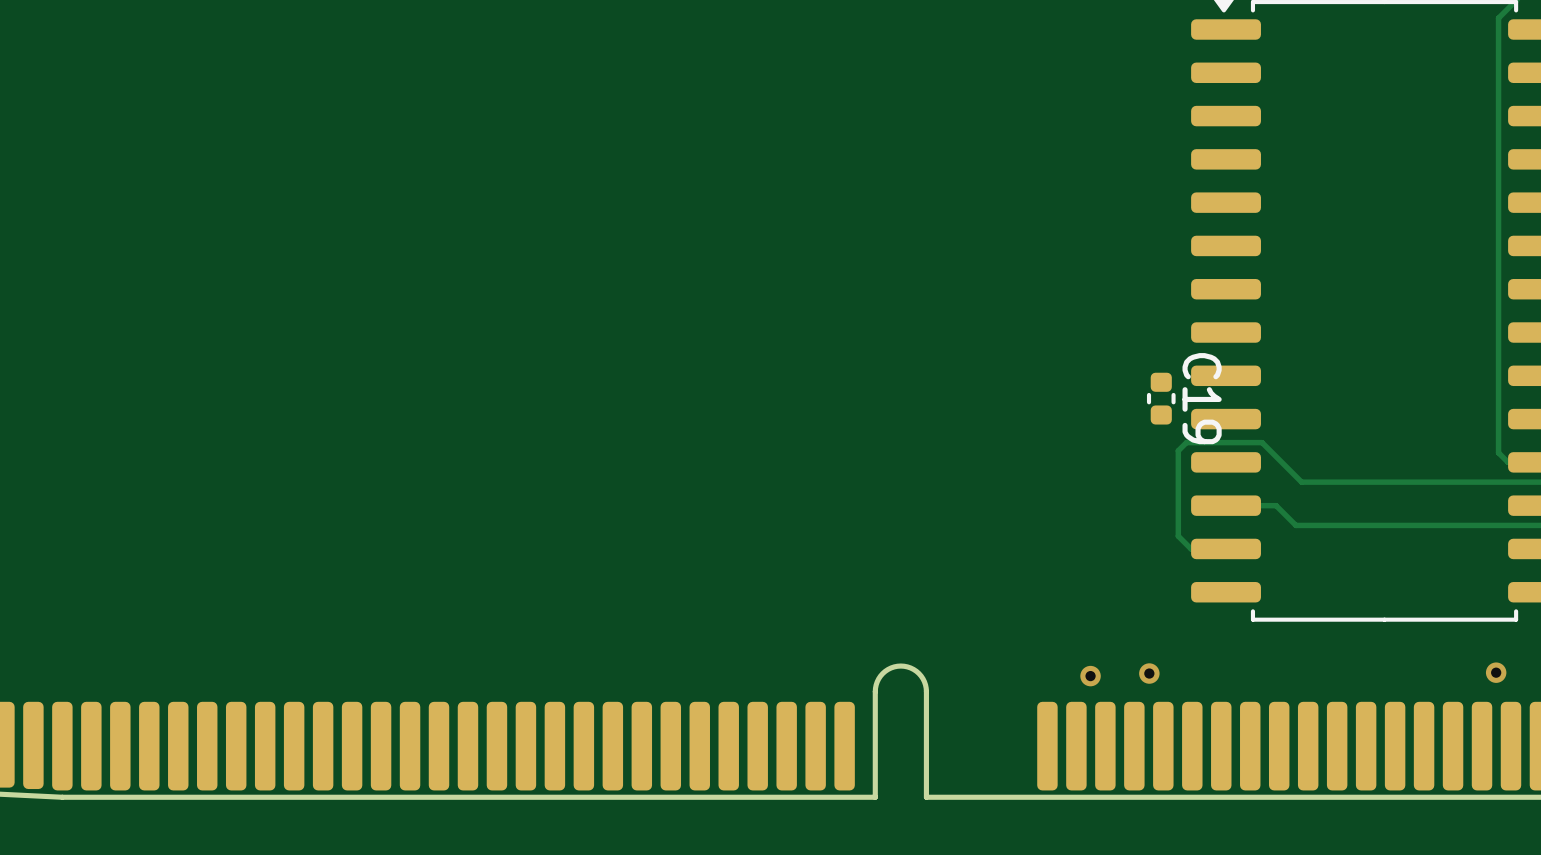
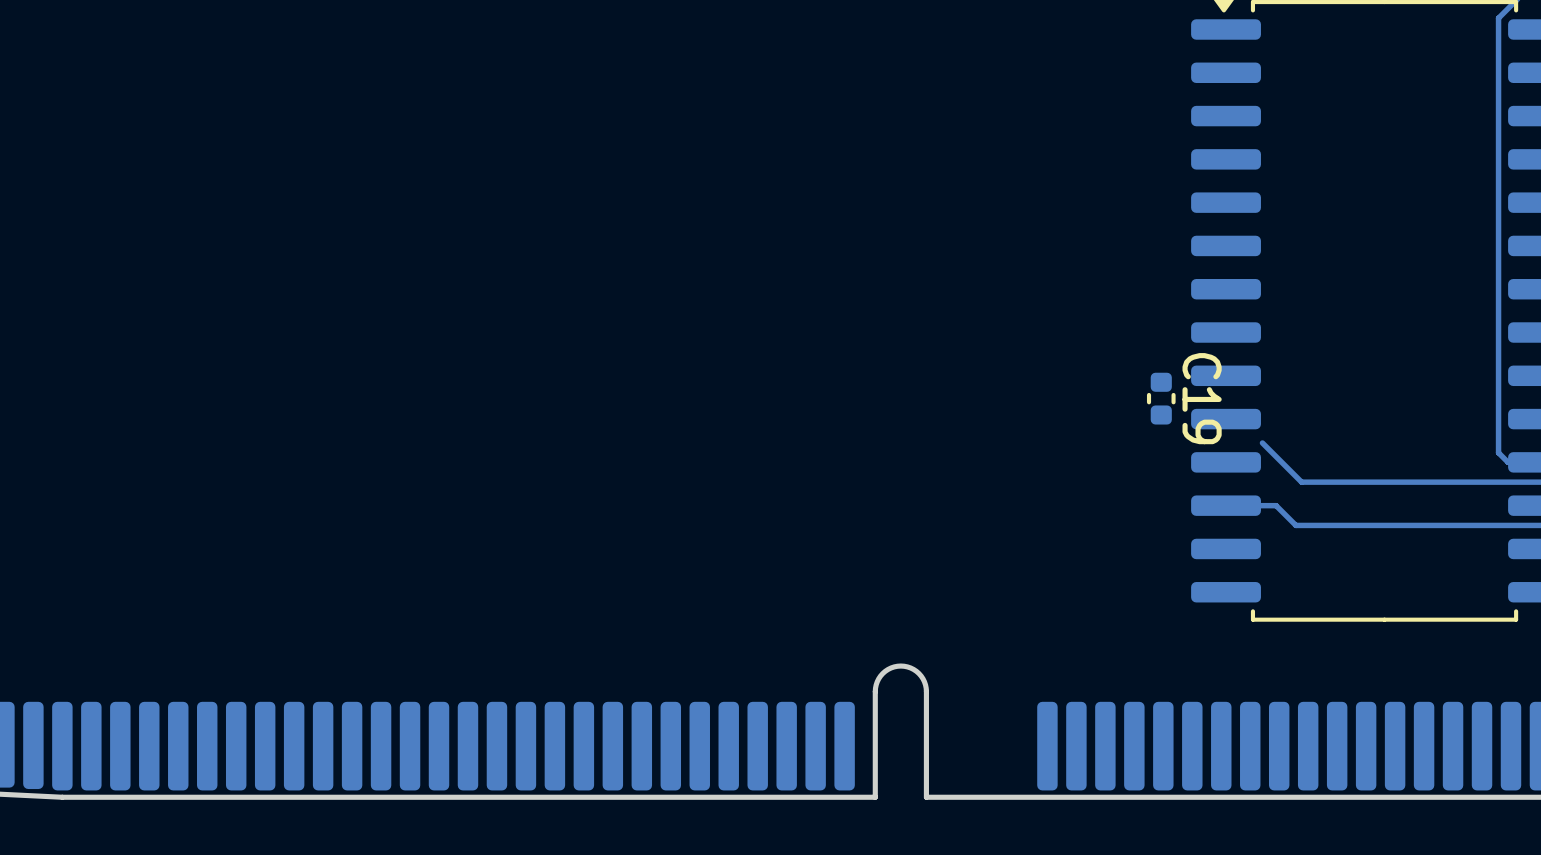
track: (1262, 442) (1186, 442) (1178, 450) (1178, 536) (1191, 548) (1226, 548) -> none
via: (1496, 672) -> none
via: (1149, 673) -> none
via: (1090, 676) -> none

